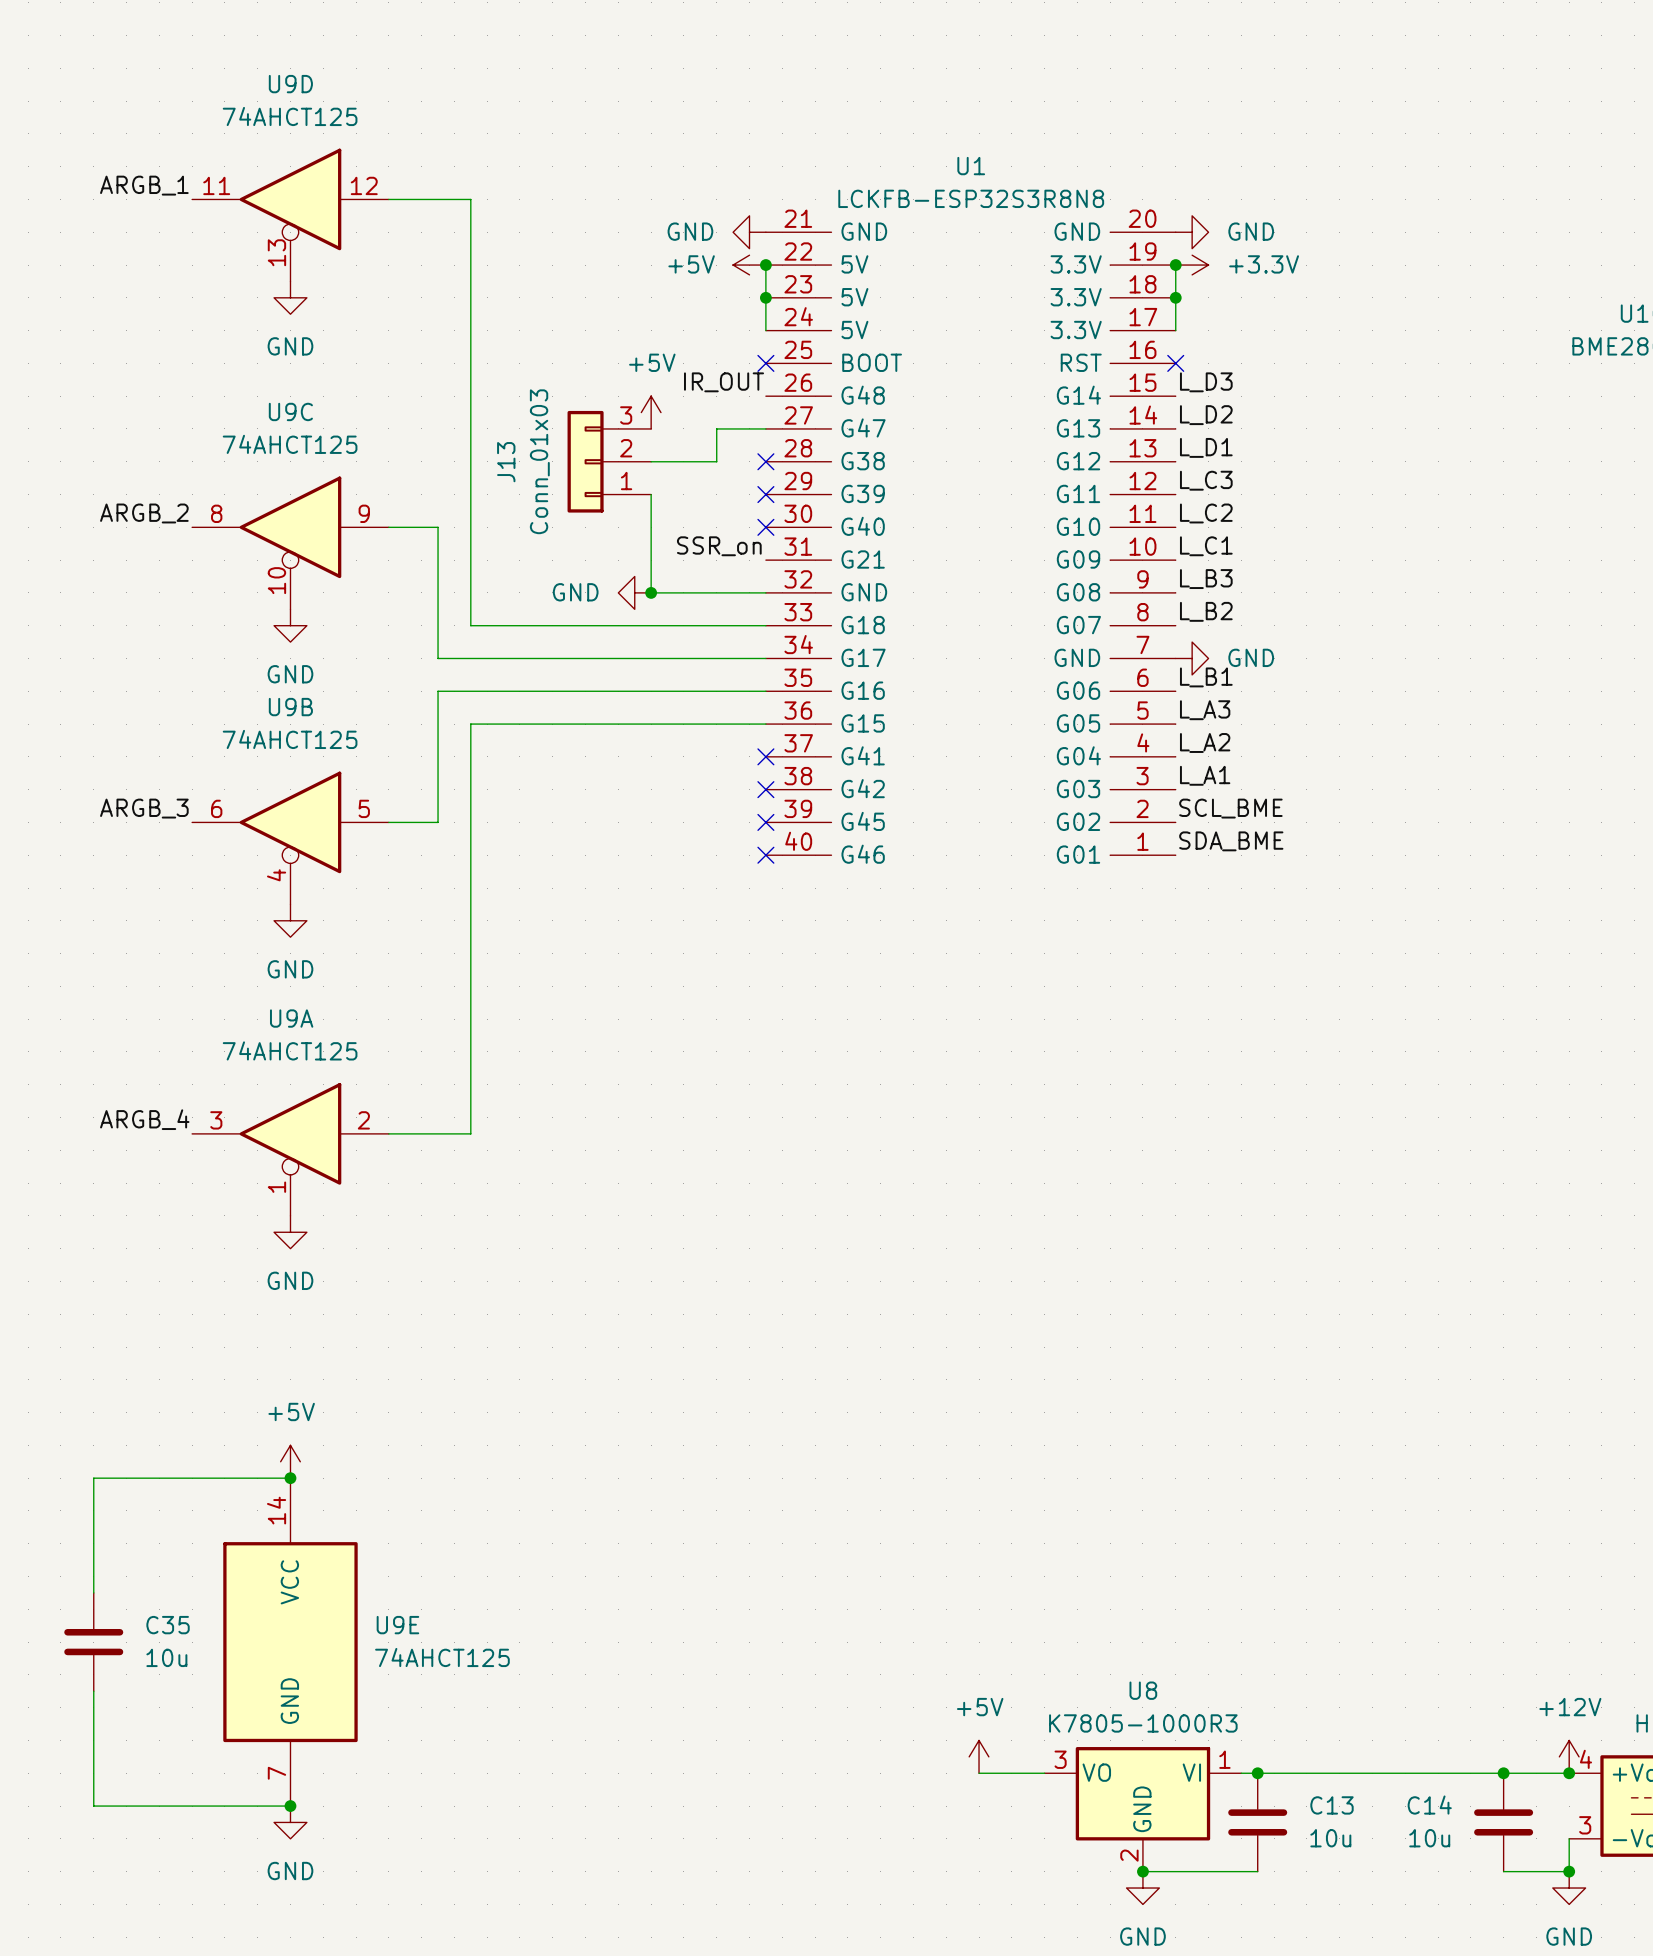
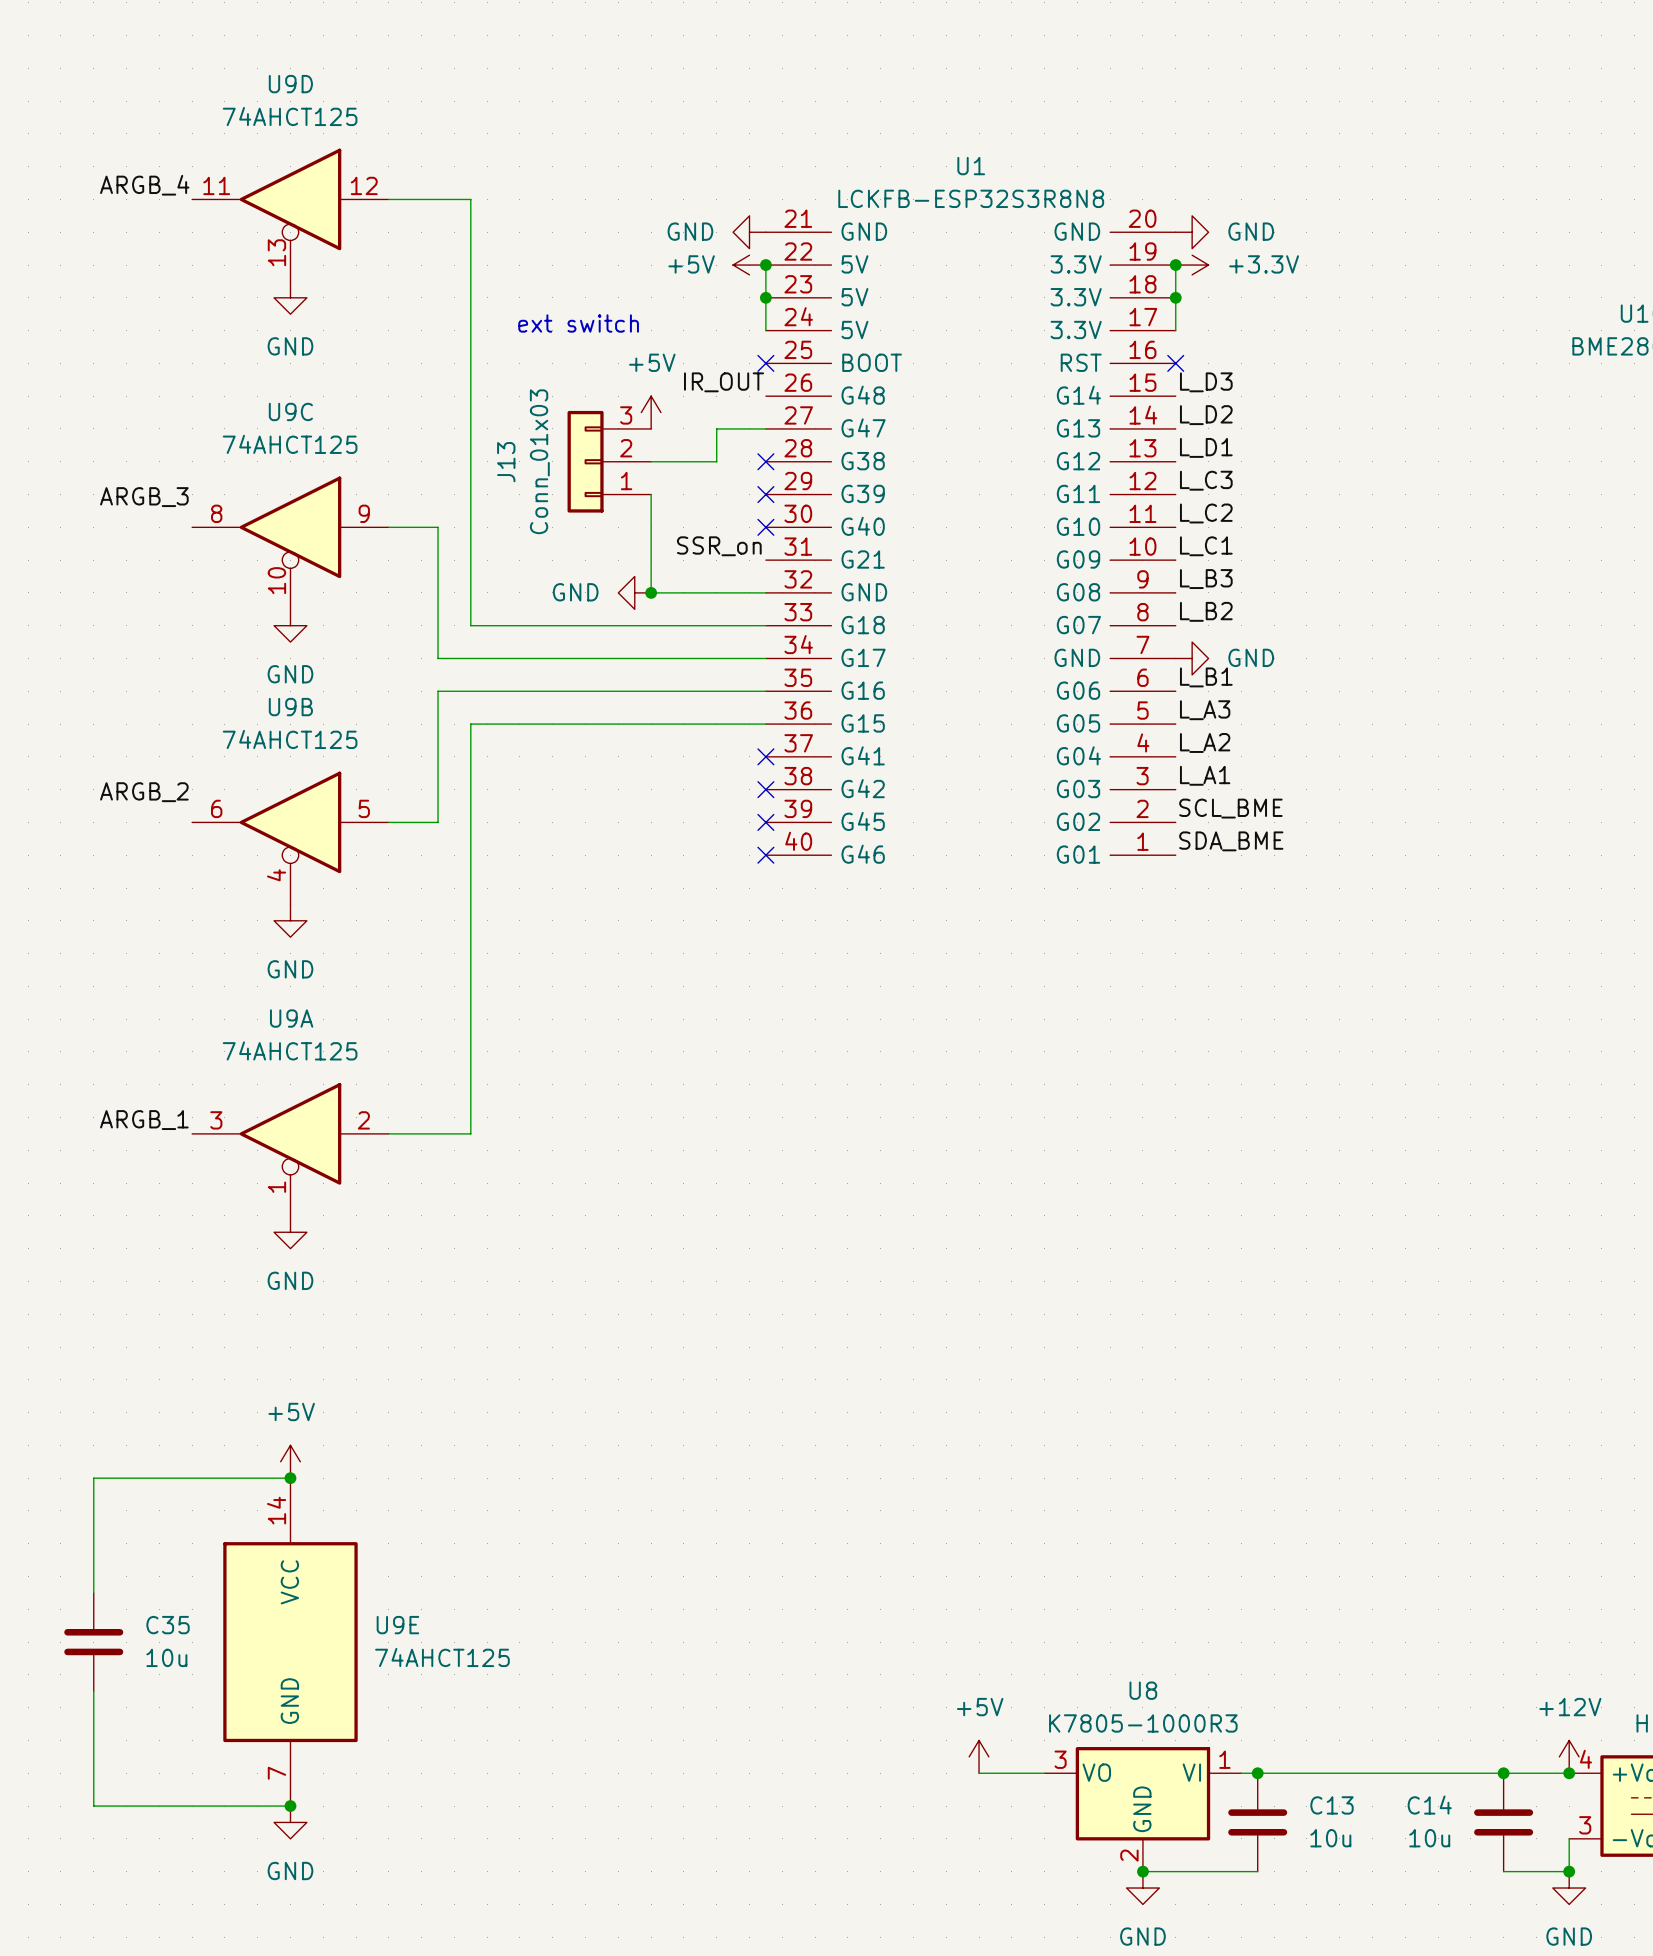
label: ARGB_1 (144, 185) -> ARGB_4 (144, 185)
text: none -> ext switch (578, 323)
label position: ARGB_2 (144, 513) -> ARGB_2 (144, 792)
label position: ARGB_3 (144, 808) -> ARGB_3 (144, 497)
label: ARGB_4 (144, 1119) -> ARGB_1 (144, 1120)

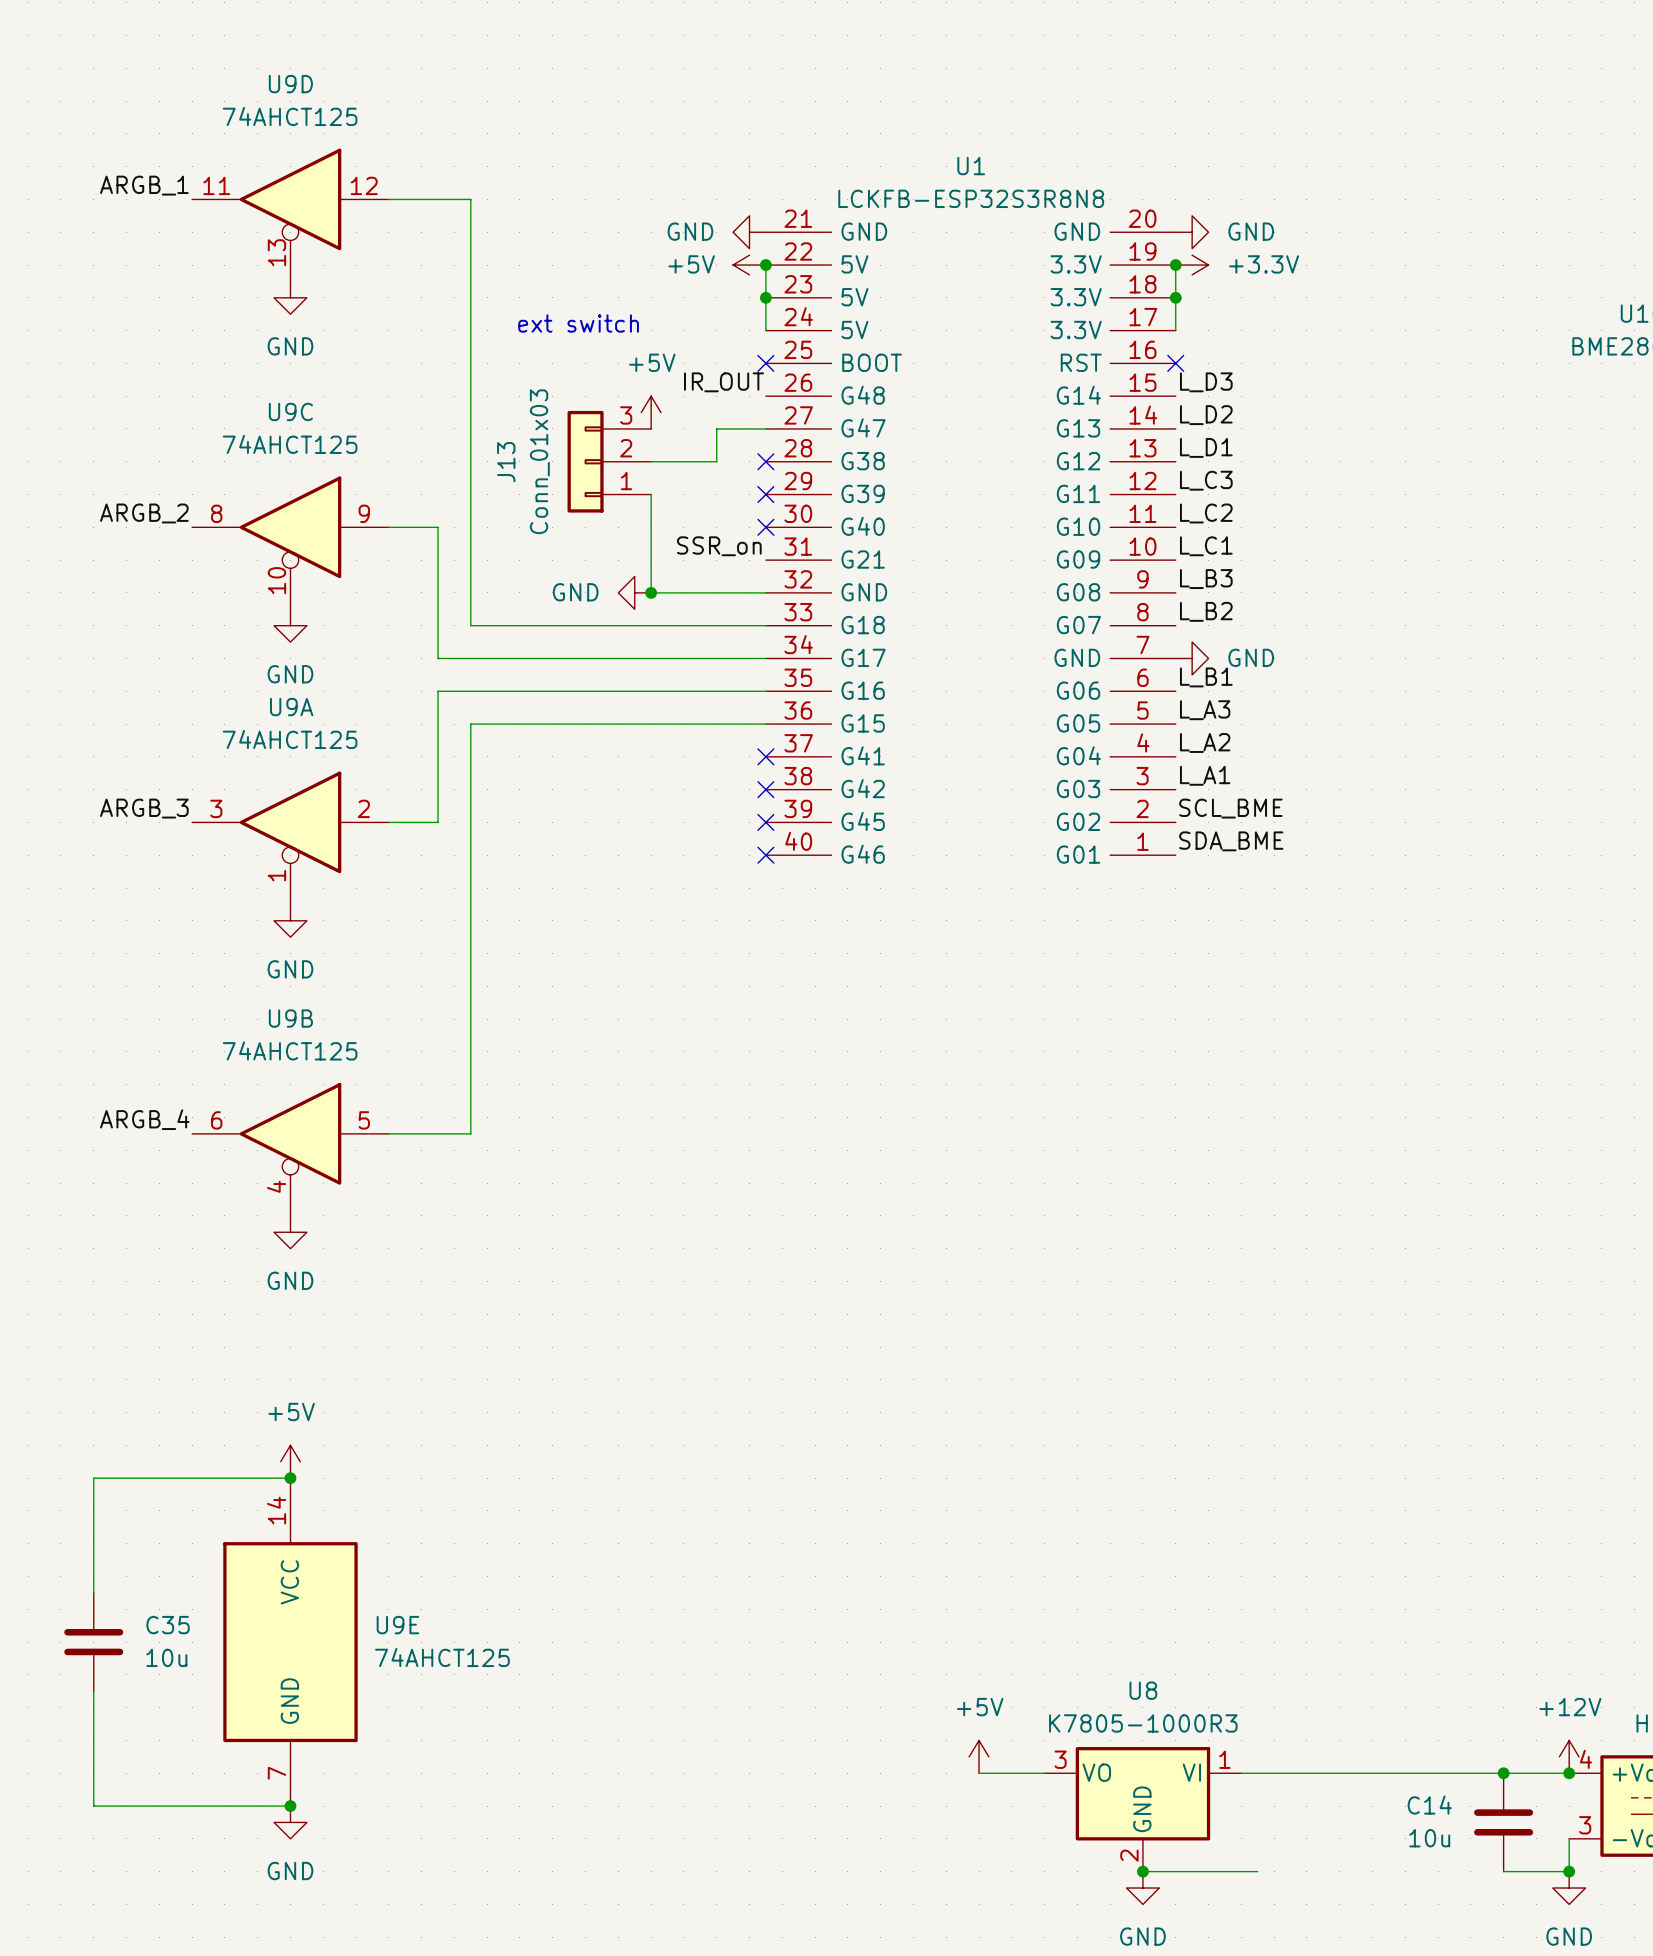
label: ARGB_4 (144, 185) -> ARGB_1 (144, 185)
label position: ARGB_3 (144, 497) -> ARGB_3 (144, 808)
label position: ARGB_2 (144, 792) -> ARGB_2 (144, 513)
U9B position: (290, 837) -> (290, 1149)
label: ARGB_1 (144, 1120) -> ARGB_4 (144, 1119)
U9A position: (290, 1149) -> (290, 837)
junction: (1257, 1773) -> none
C13: 10u (1257, 1822) -> none

